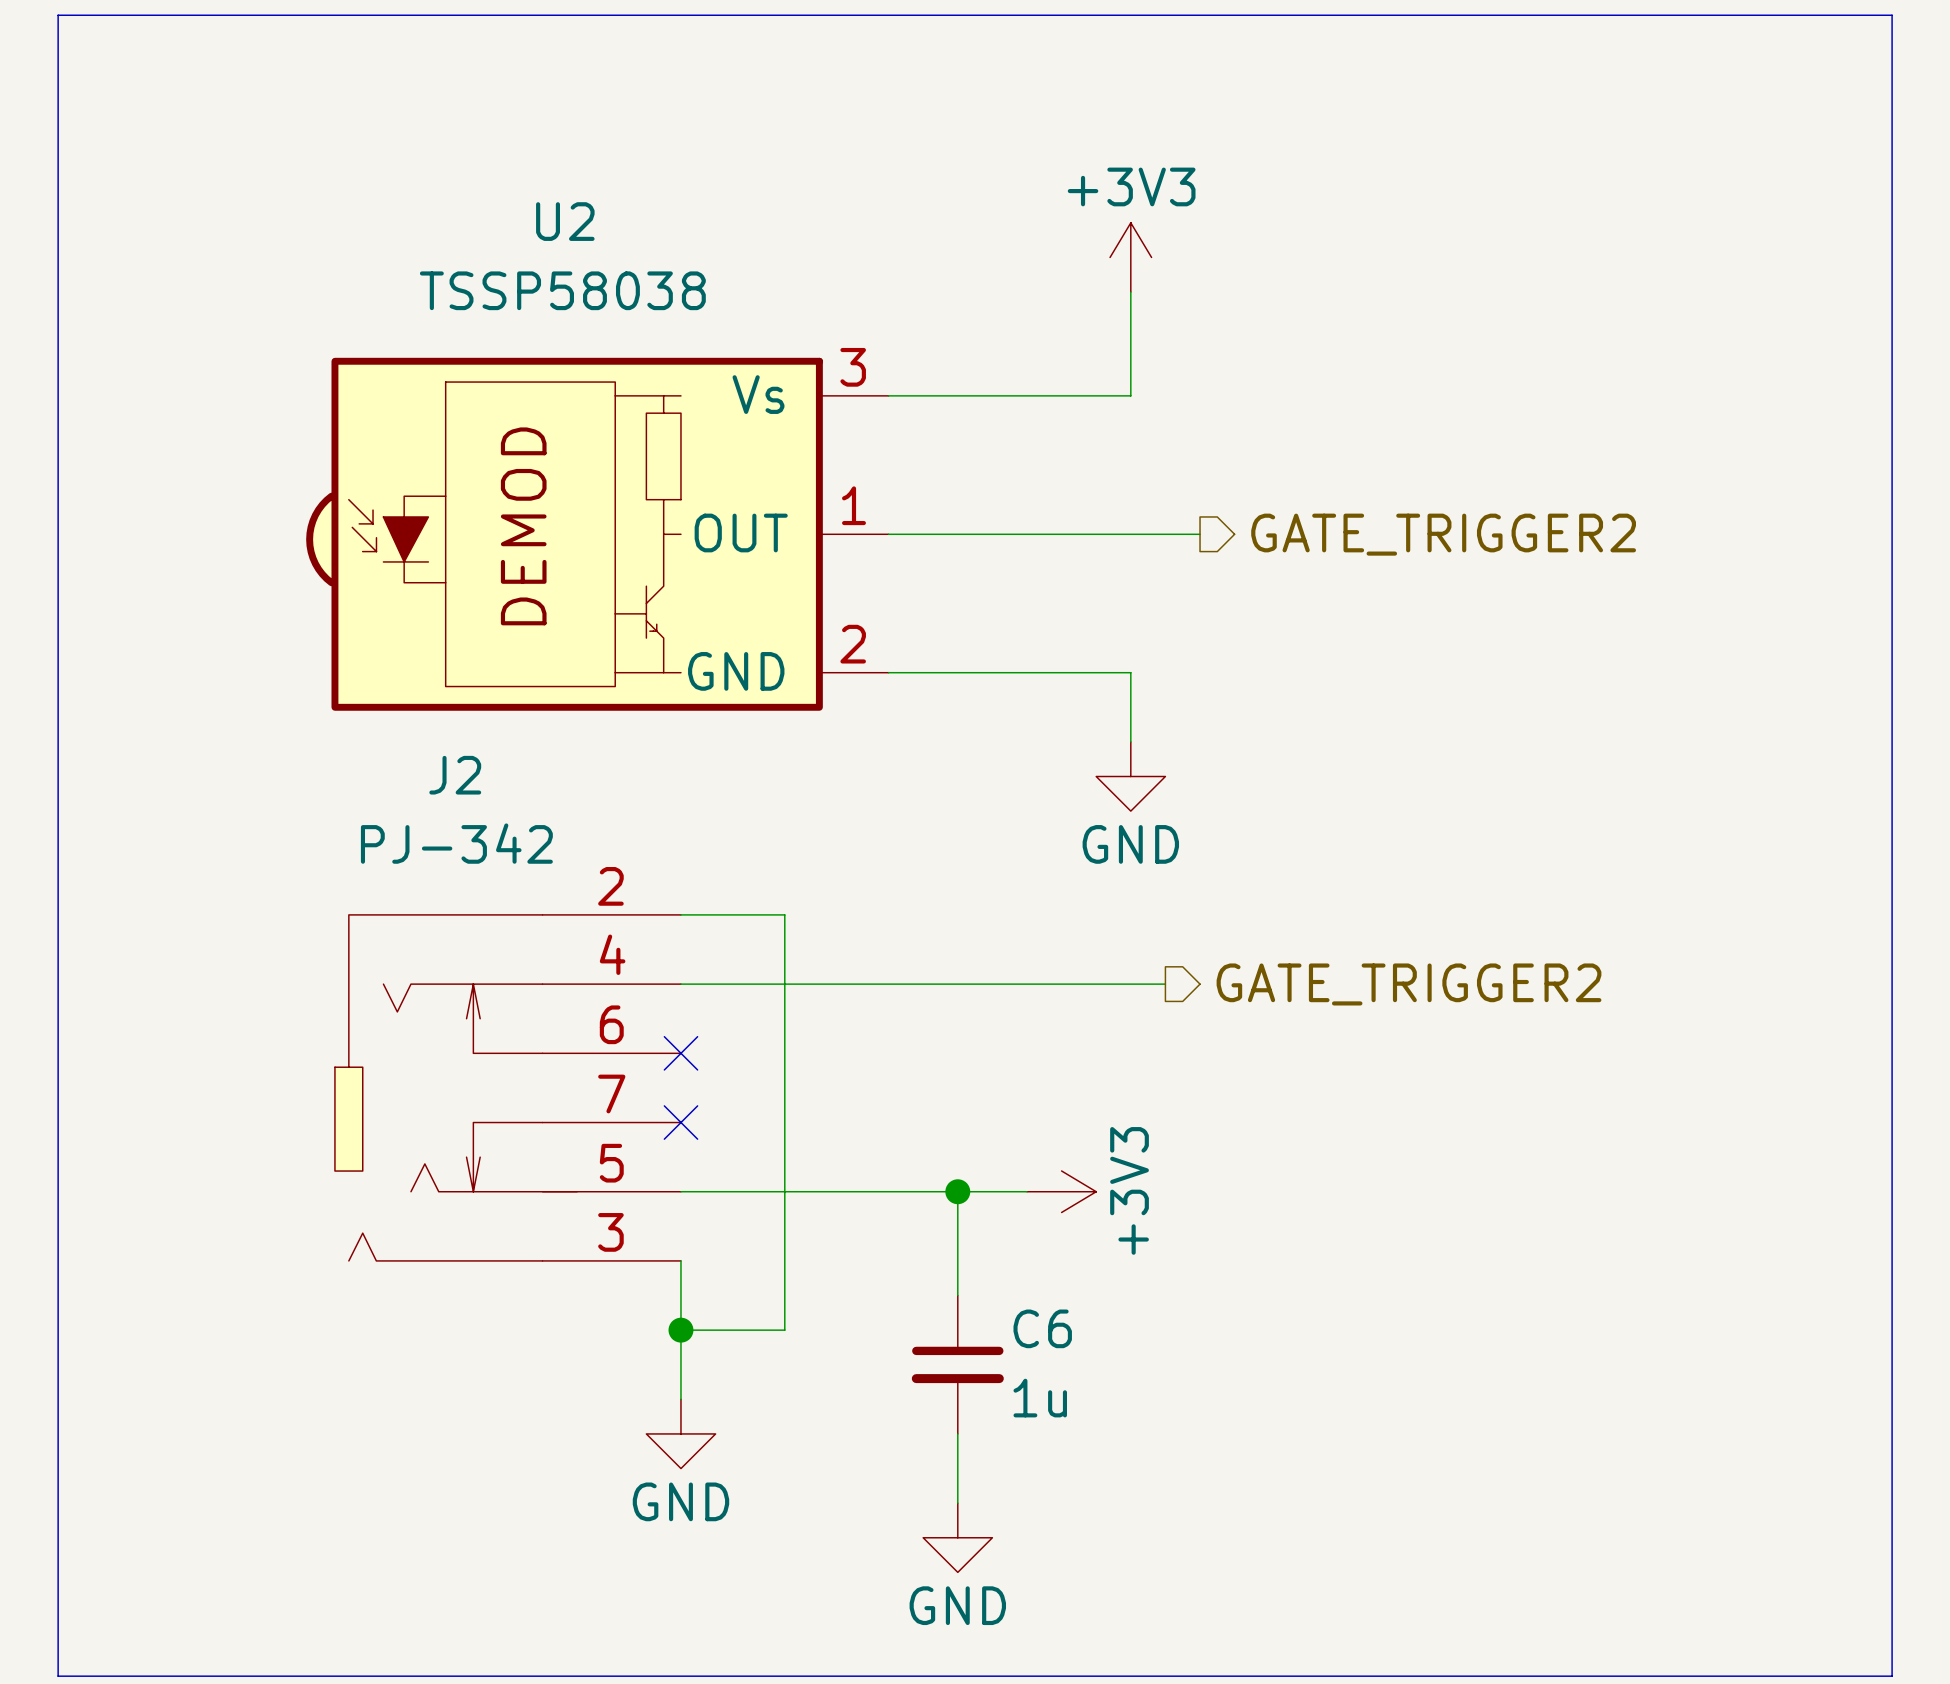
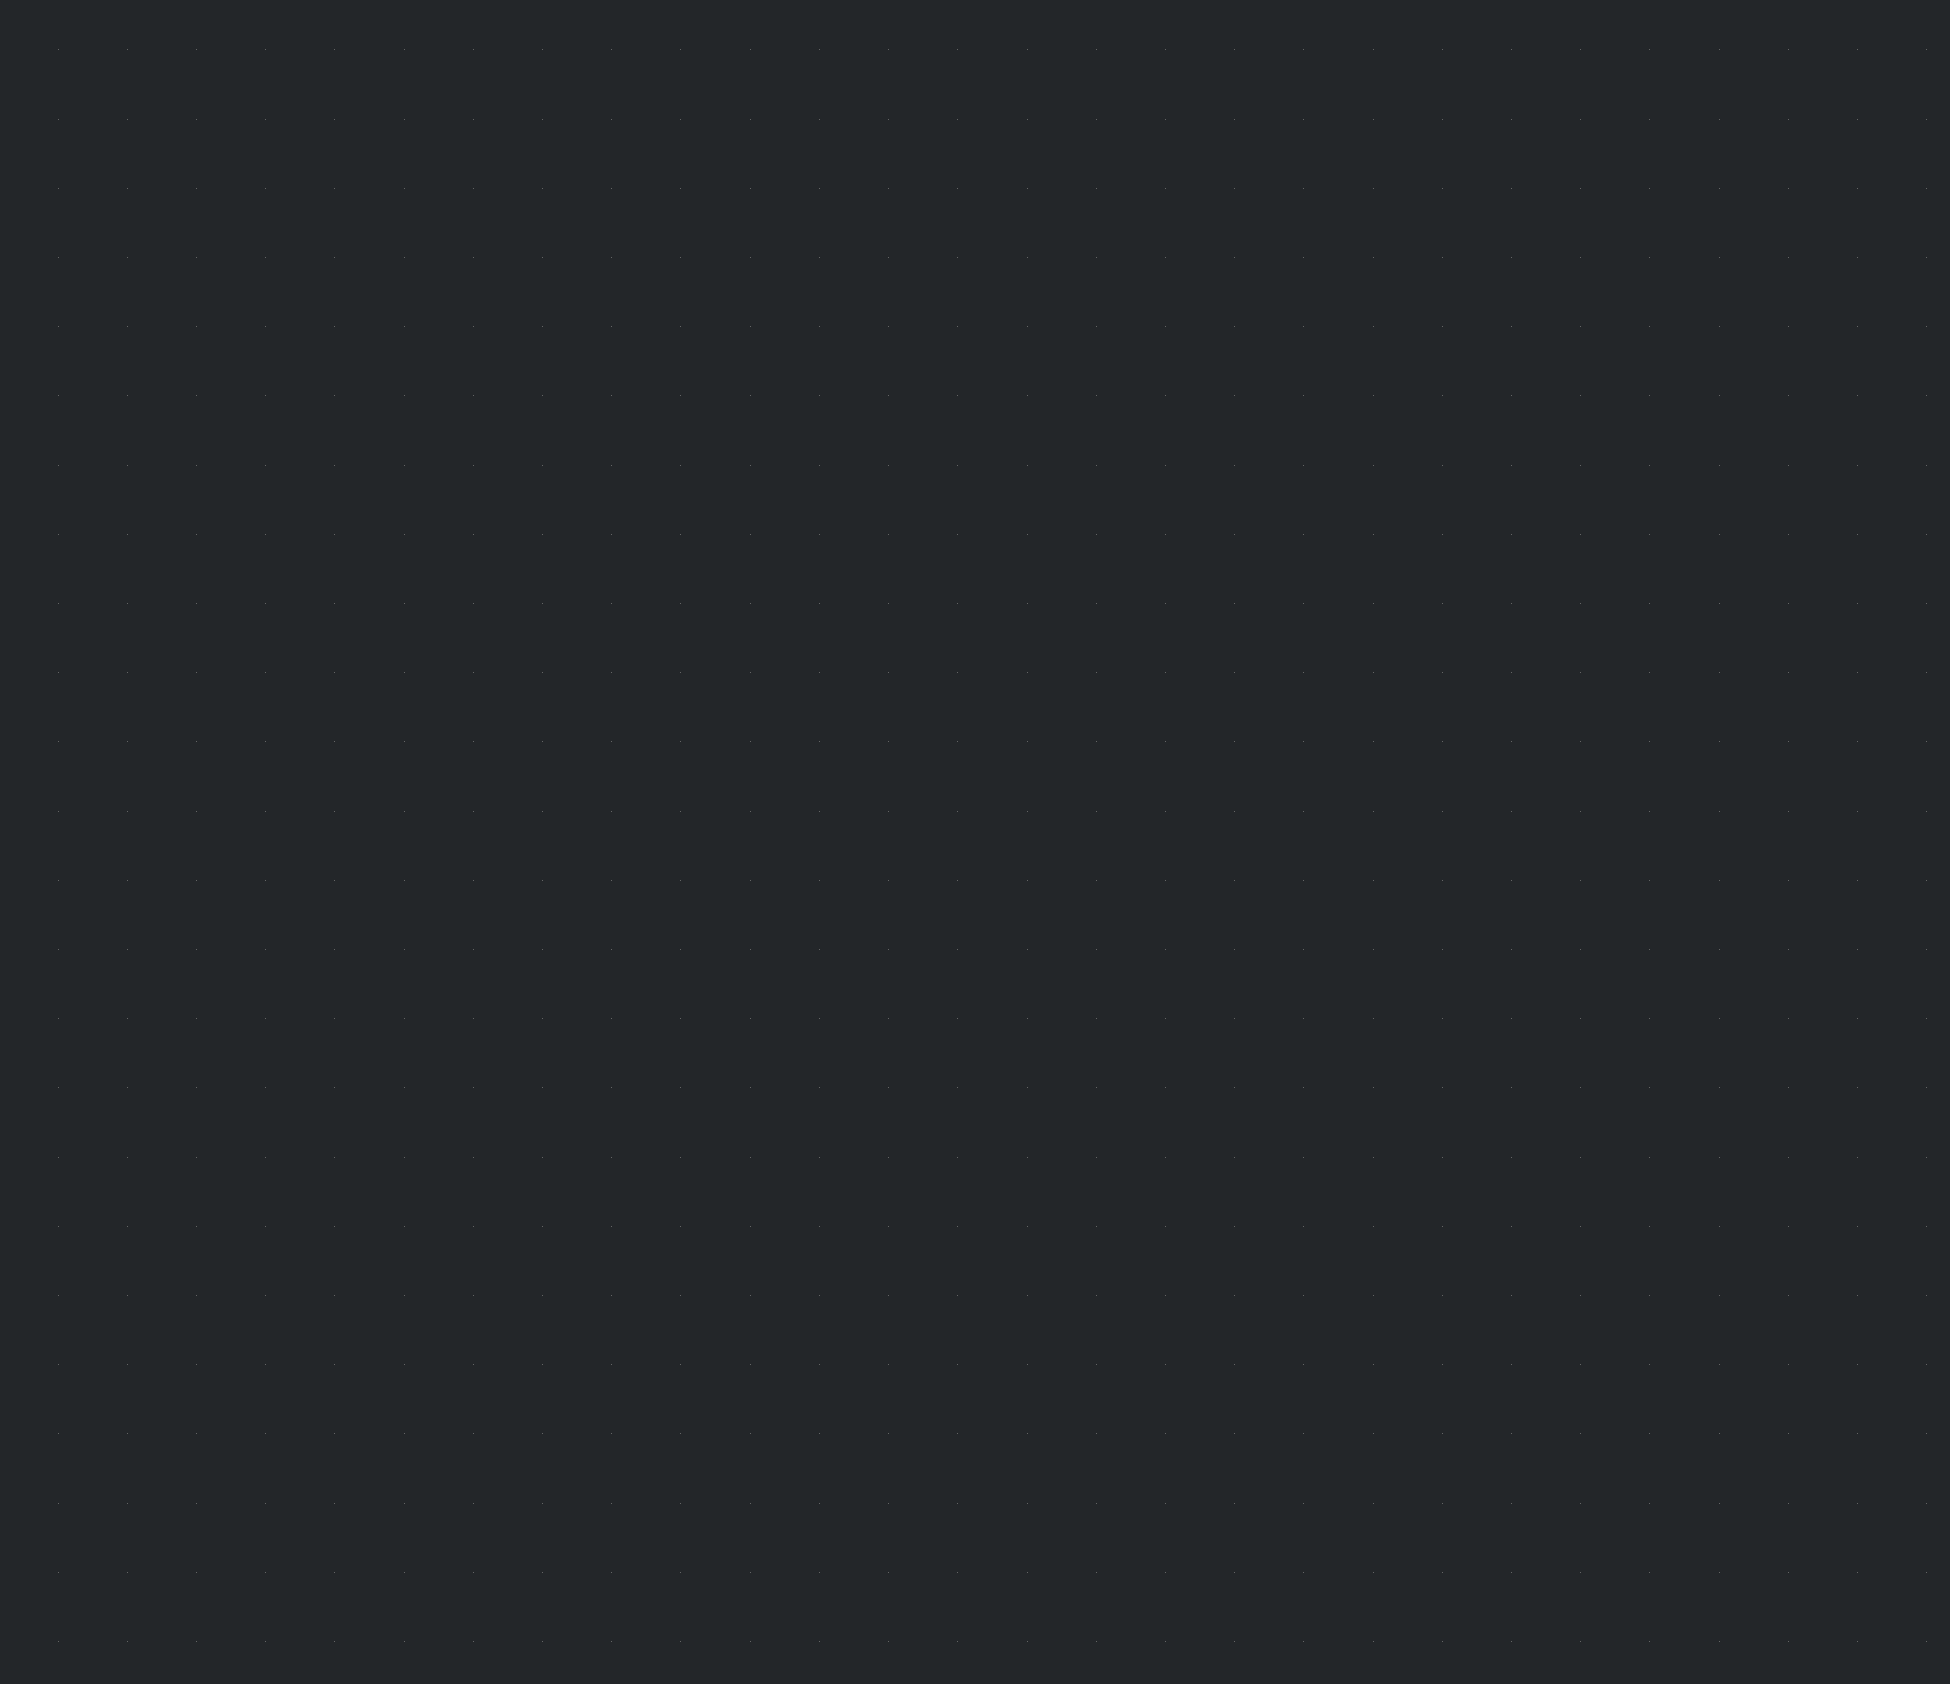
line: (58, 15) (1892, 15) (1892, 1676) (58, 1676) (58, 15) -> none
power symbol: +3V3 (1130, 257) -> none
wire: (1130, 292) (1130, 395) (888, 395) -> none
U2: TSSP58038 (597, 534) -> none
wire: (888, 534) (1200, 534) -> none
hierarchical label: GATE_TRIGGER2 (1443, 534) -> none
wire: (888, 672) (1130, 672) (1130, 741) -> none
power symbol: GND (1130, 776) -> none
wire: (680, 914) (784, 914) (784, 1330) (680, 1330) -> none
wire: (680, 984) (1165, 984) -> none
hierarchical label: GATE_TRIGGER2 (1409, 984) -> none
no-connect mark: (680, 1053) -> none
J2: (507, 1087) -> none
no-connect mark: (680, 1122) -> none
wire: (680, 1191) (1027, 1191) -> none
wire: (957, 1191) (957, 1295) -> none
junction: (957, 1191) -> none
power symbol: +3V3 (1061, 1191) -> none
wire: (680, 1260) (680, 1399) -> none
junction: (680, 1330) -> none
C6: (957, 1364) -> none
power symbol: GND (680, 1433) -> none
wire: (957, 1433) (957, 1503) -> none
power symbol: GND (957, 1537) -> none

